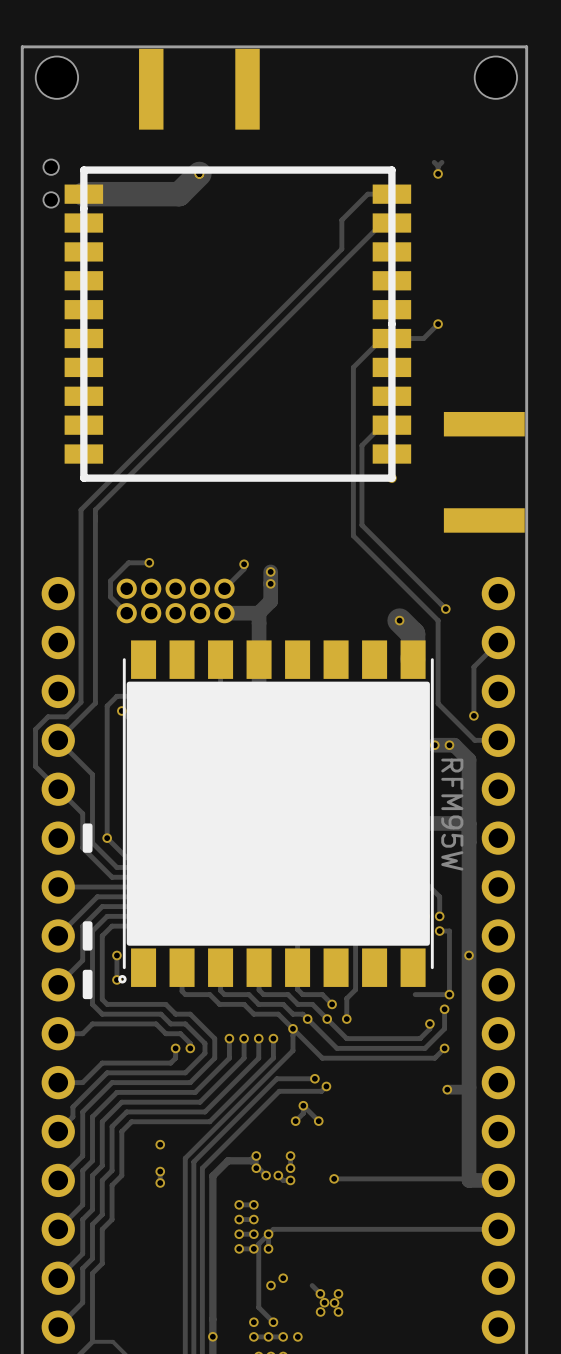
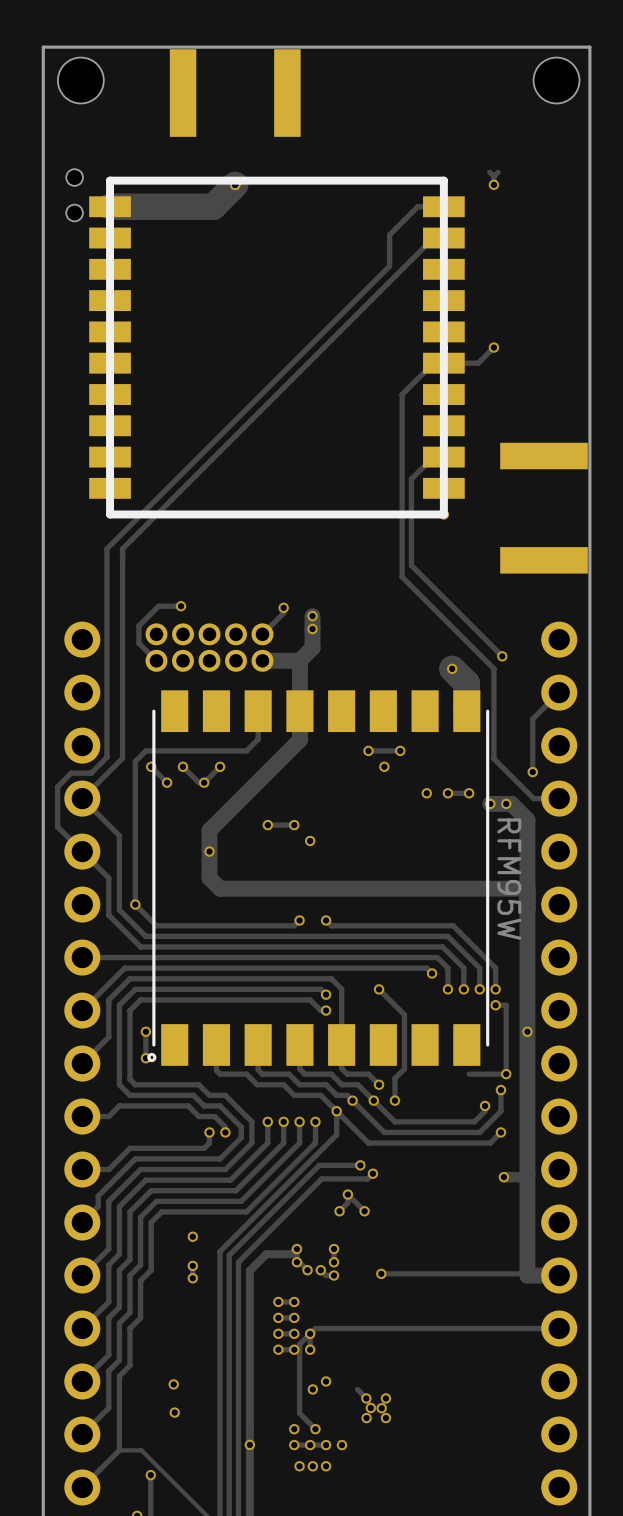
drawing: [126, 681, 430, 946] -> none
drawing: [82, 823, 93, 853] -> none
drawing: [82, 921, 93, 1000] -> none
via: none -> (173, 1384)
via: none -> (174, 1412)

